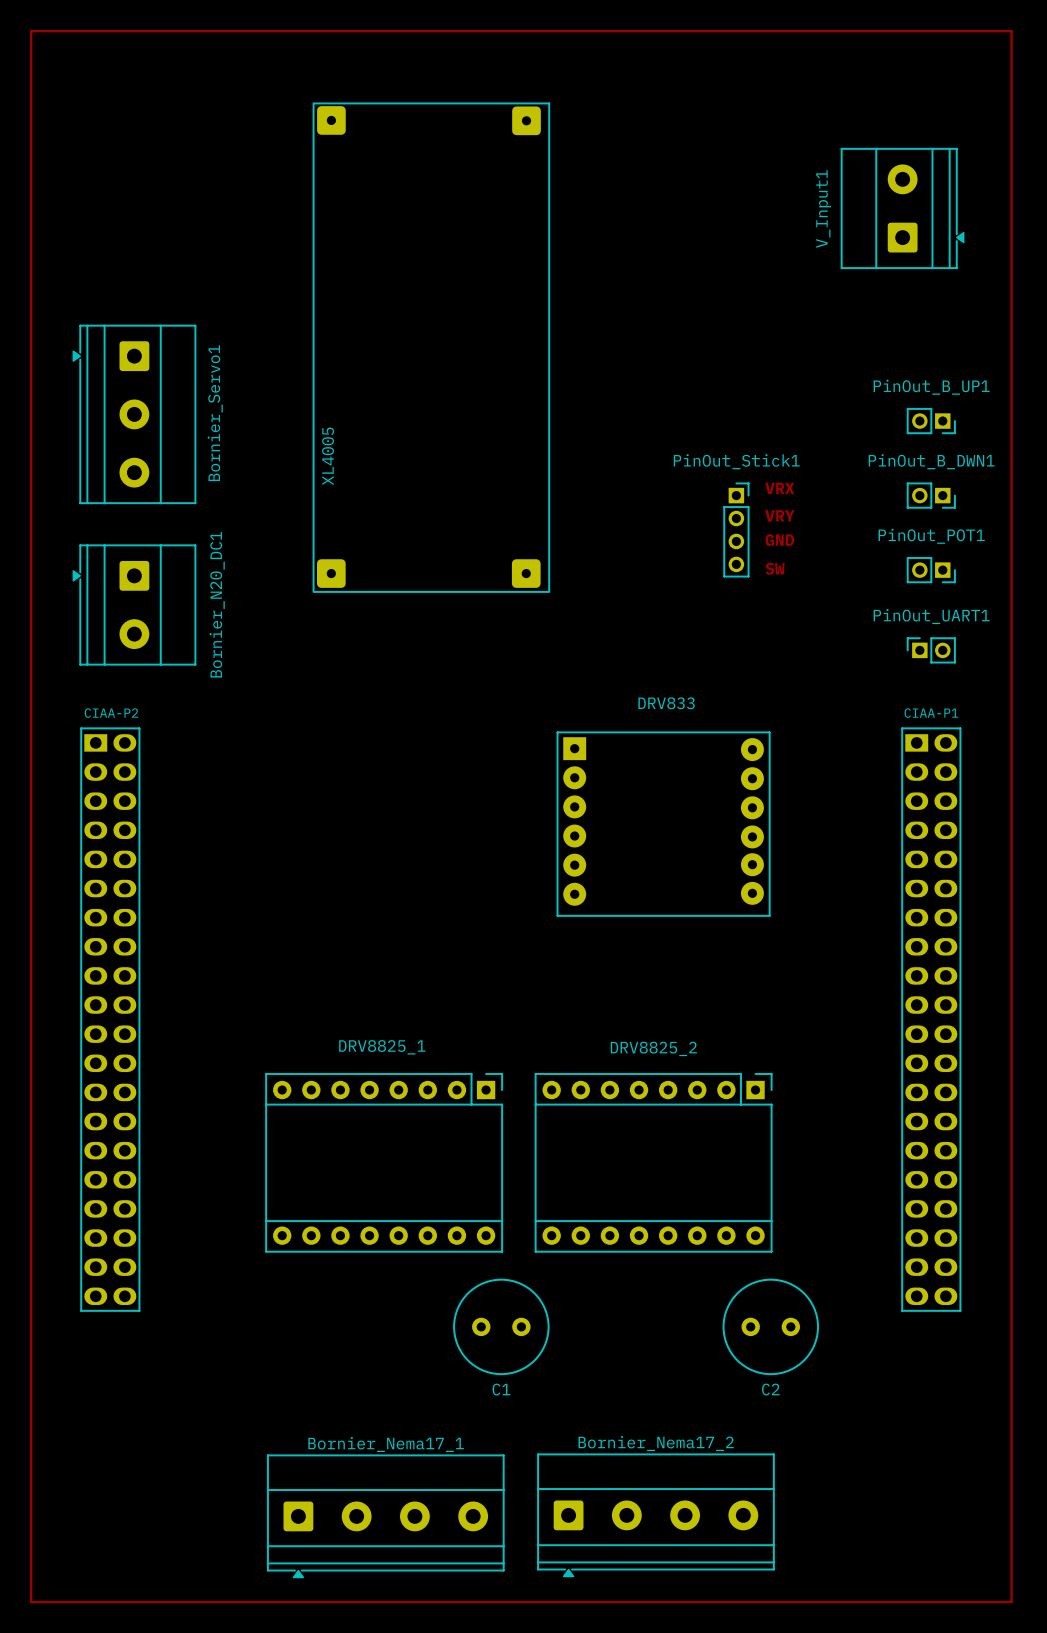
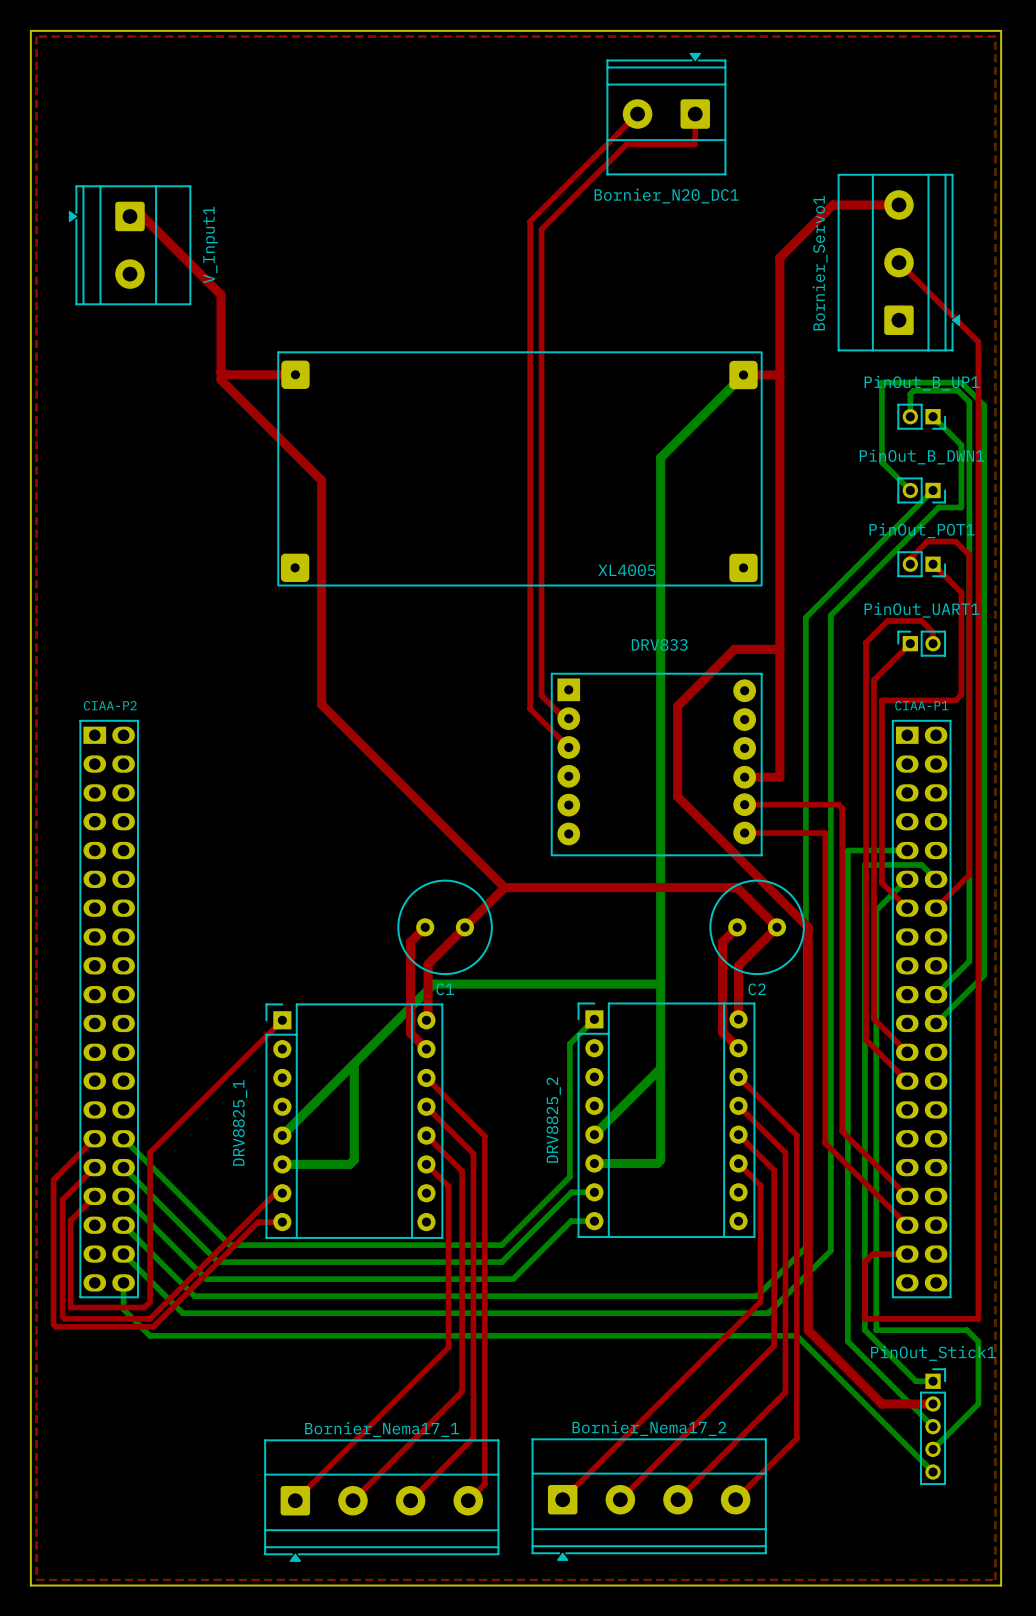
top track: (31, 31) (31, 1602) (1011, 1602) (1011, 31) (31, 31) -> none
board edge: none -> (30, 30) (1001, 30) (1001, 1585) (30, 1585) (30, 30)
top zone outline: none -> (36, 36) (36, 1579) (995, 1579) (995, 36) (36, 36)
top track: none -> (637, 114) (530, 221) (530, 708) (568, 747)
top track: none -> (694, 114) (694, 144) (626, 144) (541, 229) (541, 695) (564, 718) (568, 718)
top track: none -> (898, 204) (832, 204) (779, 257) (779, 777) (744, 777)
V_Input1 rotation: 0° (902, 208) -> 180° (129, 245)
V_Input1 position: (902, 208) -> (129, 245)
top track: none -> (129, 216) (142, 216) (221, 294) (221, 379) (321, 480) (321, 704) (504, 887)
top track: none -> (898, 262) (978, 342) (978, 1318) (864, 1318) (864, 1262) (872, 1254) (907, 1254)
XL4005 rotation: 0° (431, 347) -> 90° counterclockwise (519, 468)
top track: none -> (221, 371) (224, 374) (295, 374)
top track: none -> (743, 375) (777, 375) (779, 376)
bottom track: none -> (743, 375) (660, 457) (660, 1159) (657, 1163) (594, 1163)
Bornier_Servo1 rotation: 0° (134, 414) -> 180° (899, 262)
Bornier_Servo1 position: (134, 414) -> (899, 262)
bottom track: none -> (910, 416) (910, 394) (913, 390) (958, 390) (969, 401) (969, 961) (936, 994)
bottom track: none -> (933, 416) (961, 445) (961, 507) (938, 507) (830, 615) (830, 1250) (768, 1313) (182, 1313) (123, 1254)
PinOut_Stick1 footprint: [723, 482, 750, 578] -> [920, 1368, 946, 1485]
text: VRX (779, 488) -> none
bottom track: none -> (910, 490) (881, 462) (881, 382) (961, 382) (984, 405) (984, 975) (936, 1023)
bottom track: none -> (933, 490) (805, 617) (805, 1247) (757, 1296) (194, 1296) (123, 1225)
text: VRY (779, 515) -> none
text: GND (779, 540) -> none
text: SW (775, 568) -> none
top track: none -> (910, 564) (910, 558) (927, 541) (955, 541) (969, 555) (969, 874) (936, 908)
top track: none -> (933, 564) (961, 592) (961, 694) (955, 700) (881, 700) (881, 882) (907, 908)
Bornier_N20_DC1 rotation: 0° (134, 604) -> 90° clockwise (666, 113)
Bornier_N20_DC1 position: (134, 604) -> (666, 113)
top track: none -> (910, 643) (874, 679) (874, 1019) (907, 1052)
top track: none -> (933, 643) (933, 632) (921, 620) (887, 620) (866, 642) (866, 1039) (907, 1081)
top track: none -> (779, 649) (734, 649) (677, 706) (677, 796) (808, 927) (808, 1330) (881, 1403) (933, 1403)
top track: none -> (744, 804) (838, 804) (842, 808) (842, 1131) (907, 1196)
DRV833 position: (663, 824) -> (656, 764)
top track: none -> (744, 833) (825, 833) (825, 1143) (907, 1225)
bottom track: none -> (907, 850) (847, 850) (847, 1341) (933, 1426)
bottom track: none -> (907, 879) (876, 910) (876, 1330) (967, 1330) (978, 1341) (978, 1403) (933, 1449)
bottom track: none -> (936, 879) (921, 864) (864, 864) (864, 1330) (916, 1381) (933, 1381)
top track: none -> (504, 887) (737, 887) (776, 927) (738, 965) (738, 1019)
top track: none -> (504, 887) (428, 964) (428, 1018) (426, 1020)
top track: none -> (425, 927) (410, 942) (410, 1033) (426, 1049)
top track: none -> (737, 927) (722, 942) (722, 1032) (738, 1048)
bottom track: none -> (660, 984) (433, 984) (282, 1135)
top track: none -> (282, 1020) (150, 1152) (150, 1301) (144, 1307) (70, 1307) (70, 1220) (94, 1196)
bottom track: none -> (594, 1019) (569, 1043) (569, 1177) (501, 1245) (229, 1245) (123, 1138)
bottom track: none -> (354, 1063) (354, 1159) (349, 1164) (282, 1164)
bottom track: none -> (660, 1068) (594, 1134)
top track: none -> (738, 1077) (796, 1135) (796, 1438) (735, 1499)
top track: none -> (426, 1077) (484, 1136) (484, 1484) (468, 1500)
top track: none -> (738, 1105) (785, 1152) (785, 1392) (678, 1499)
top track: none -> (426, 1106) (473, 1153) (473, 1437) (410, 1500)
top track: none -> (738, 1134) (774, 1170) (774, 1345) (620, 1499)
top track: none -> (426, 1135) (462, 1171) (462, 1391) (352, 1500)
top track: none -> (94, 1138) (53, 1179) (53, 1324) (55, 1326) (153, 1326) (258, 1222) (282, 1222)
DRV8825_1 rotation: 0° (384, 1162) -> 90° counterclockwise (354, 1121)
DRV8825_2 rotation: 0° (653, 1162) -> 90° counterclockwise (666, 1120)
top track: none -> (738, 1163) (760, 1185) (760, 1301) (562, 1499)
top track: none -> (426, 1164) (448, 1186) (448, 1347) (295, 1500)
top track: none -> (94, 1167) (62, 1199) (62, 1316) (64, 1318) (150, 1318) (275, 1193) (282, 1193)
bottom track: none -> (123, 1167) (218, 1262) (501, 1262) (571, 1192) (594, 1192)
bottom track: none -> (123, 1196) (206, 1279) (513, 1279) (571, 1221) (594, 1221)
bottom track: none -> (121, 1284) (123, 1282) (123, 1309) (150, 1335) (796, 1335) (933, 1472)
C1 position: (501, 1326) -> (445, 927)
C2 position: (770, 1326) -> (757, 927)

